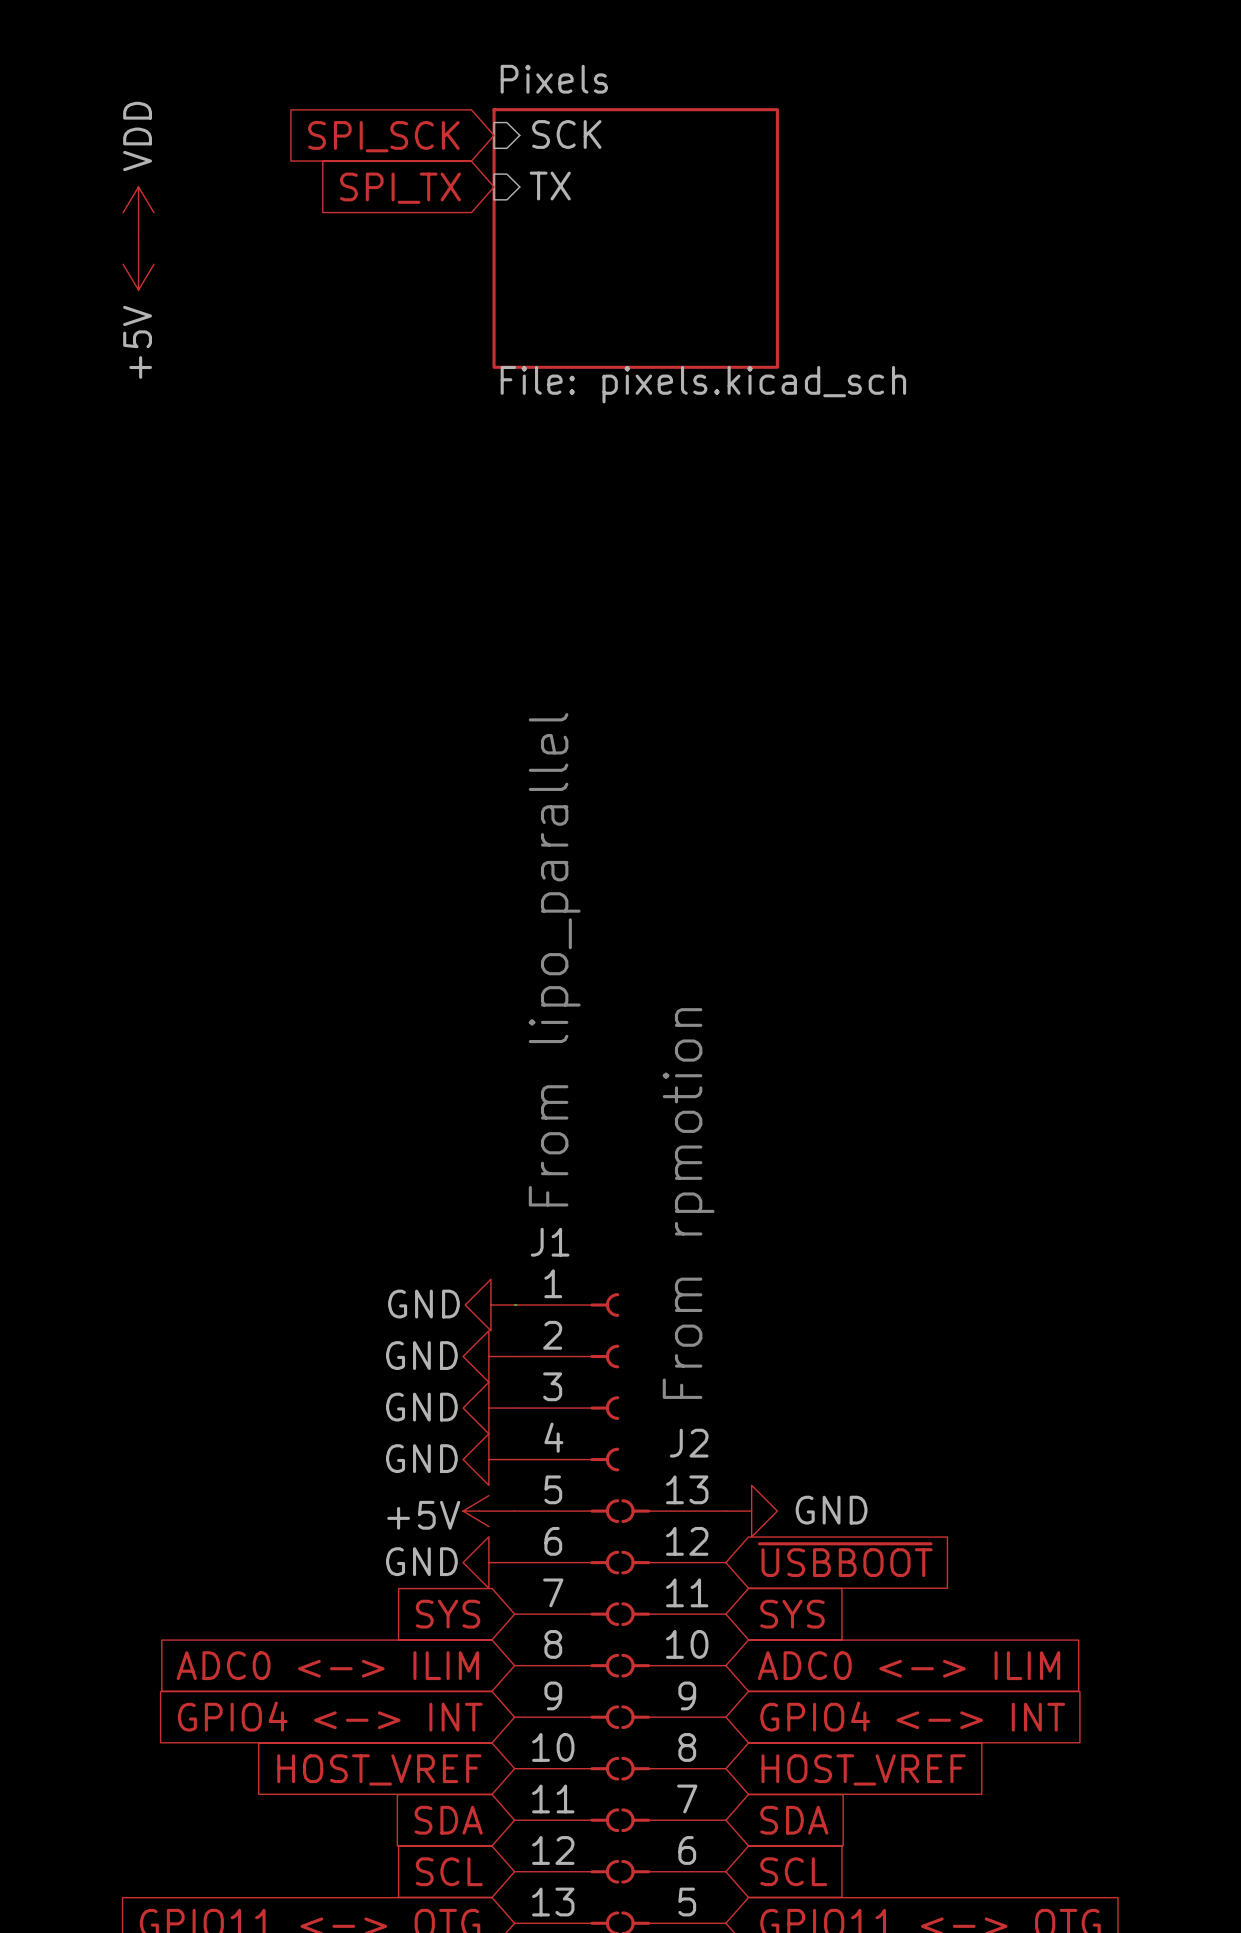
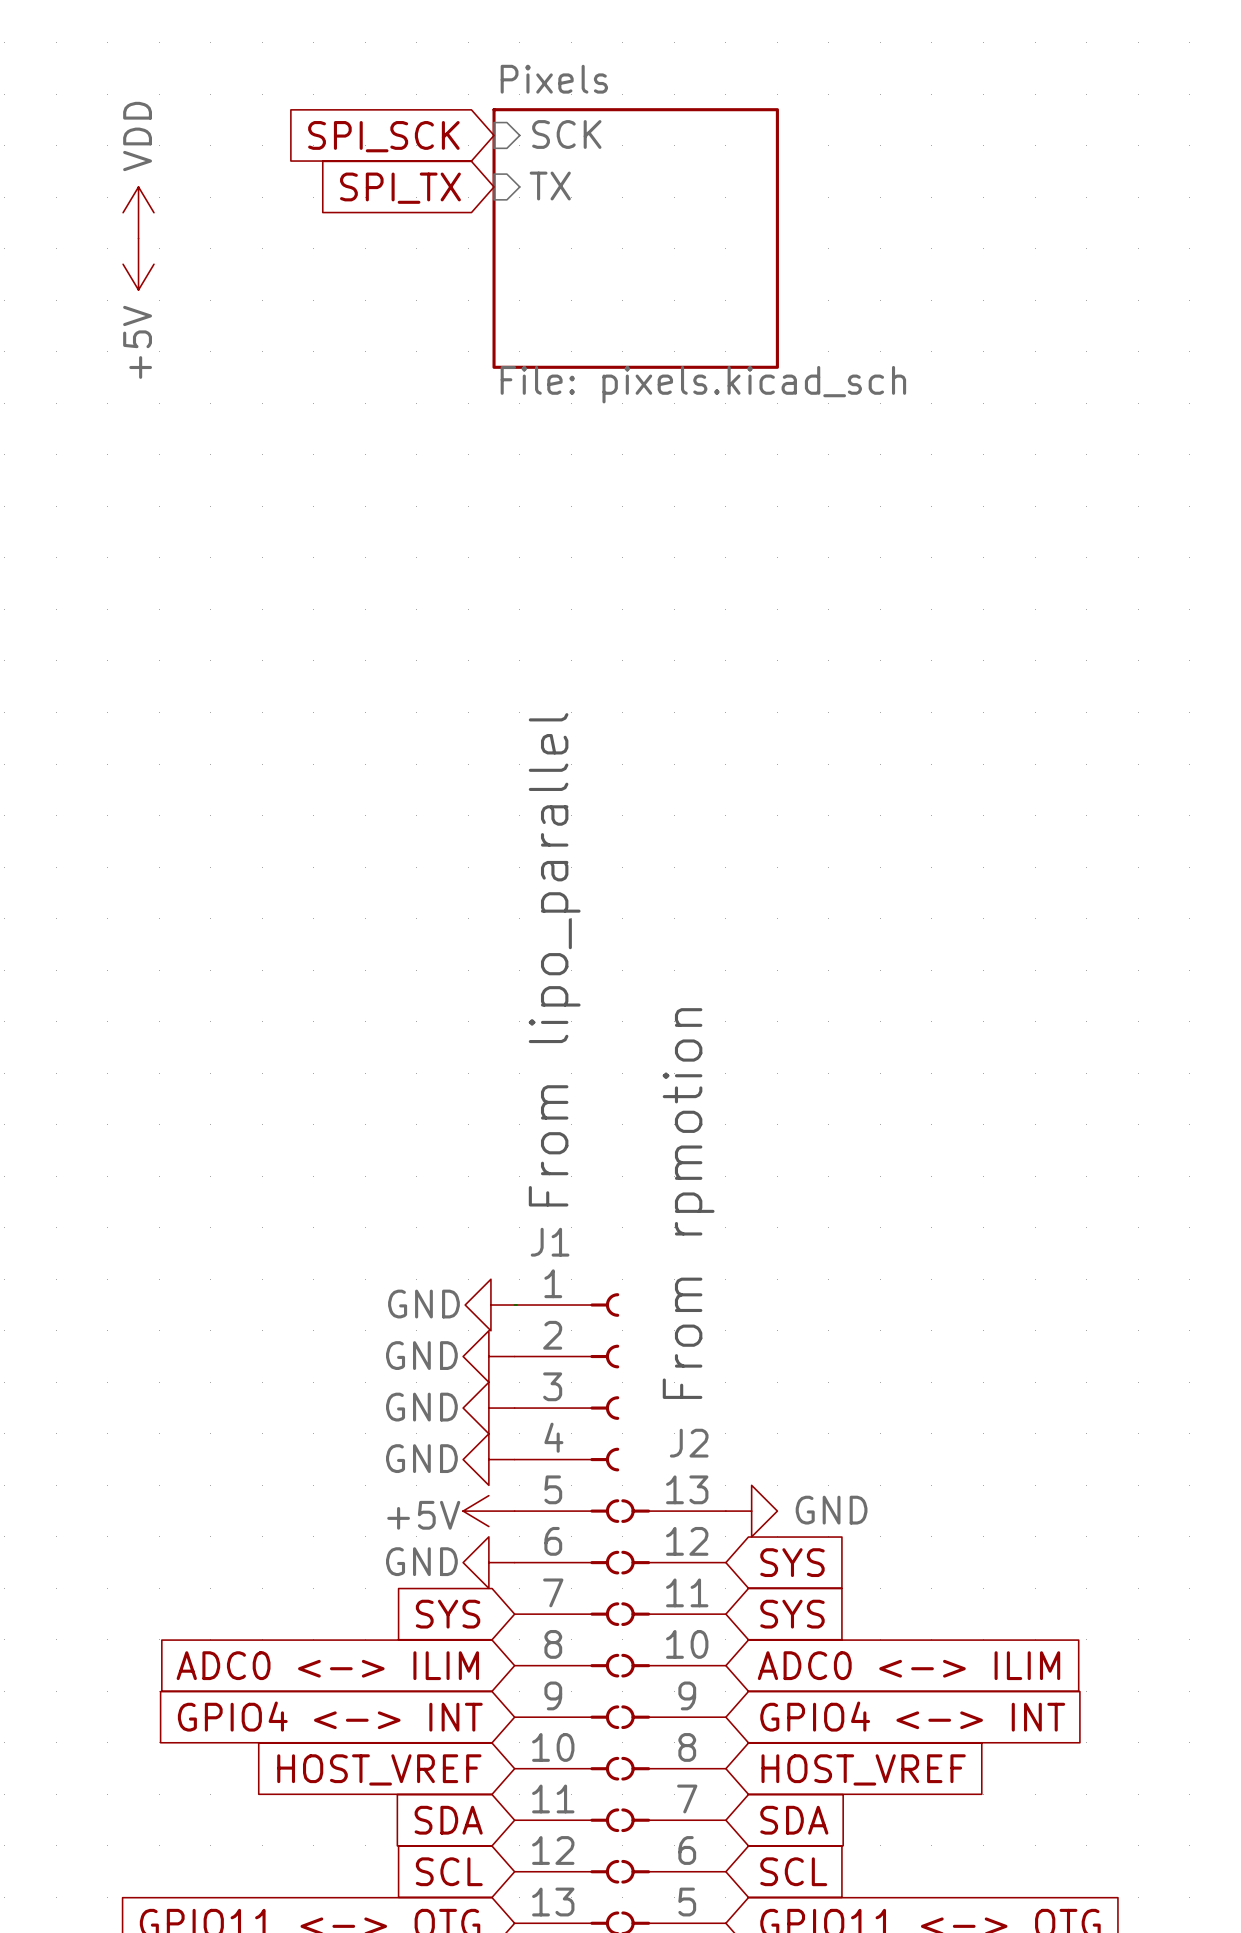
global label: ~{USBBOOT} (845, 1559) -> SYS (792, 1562)

